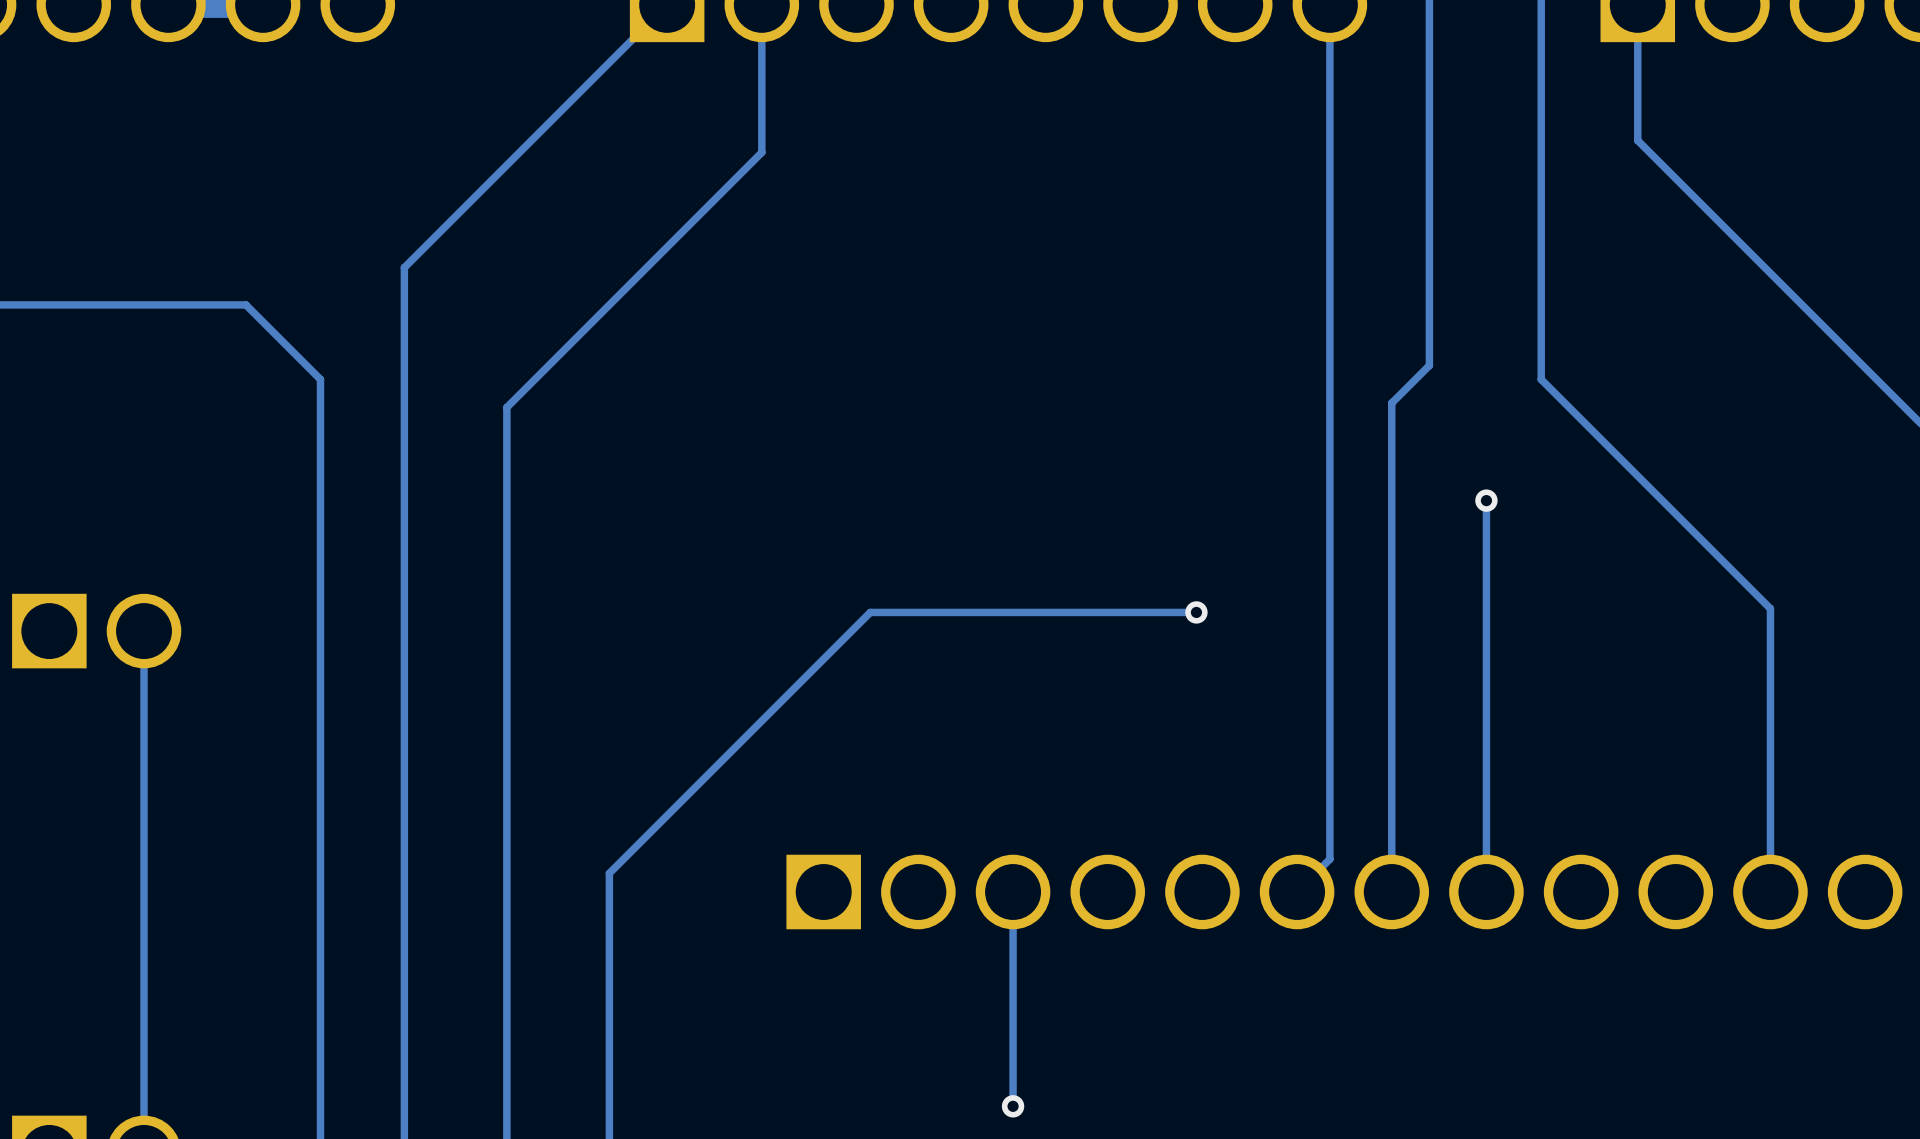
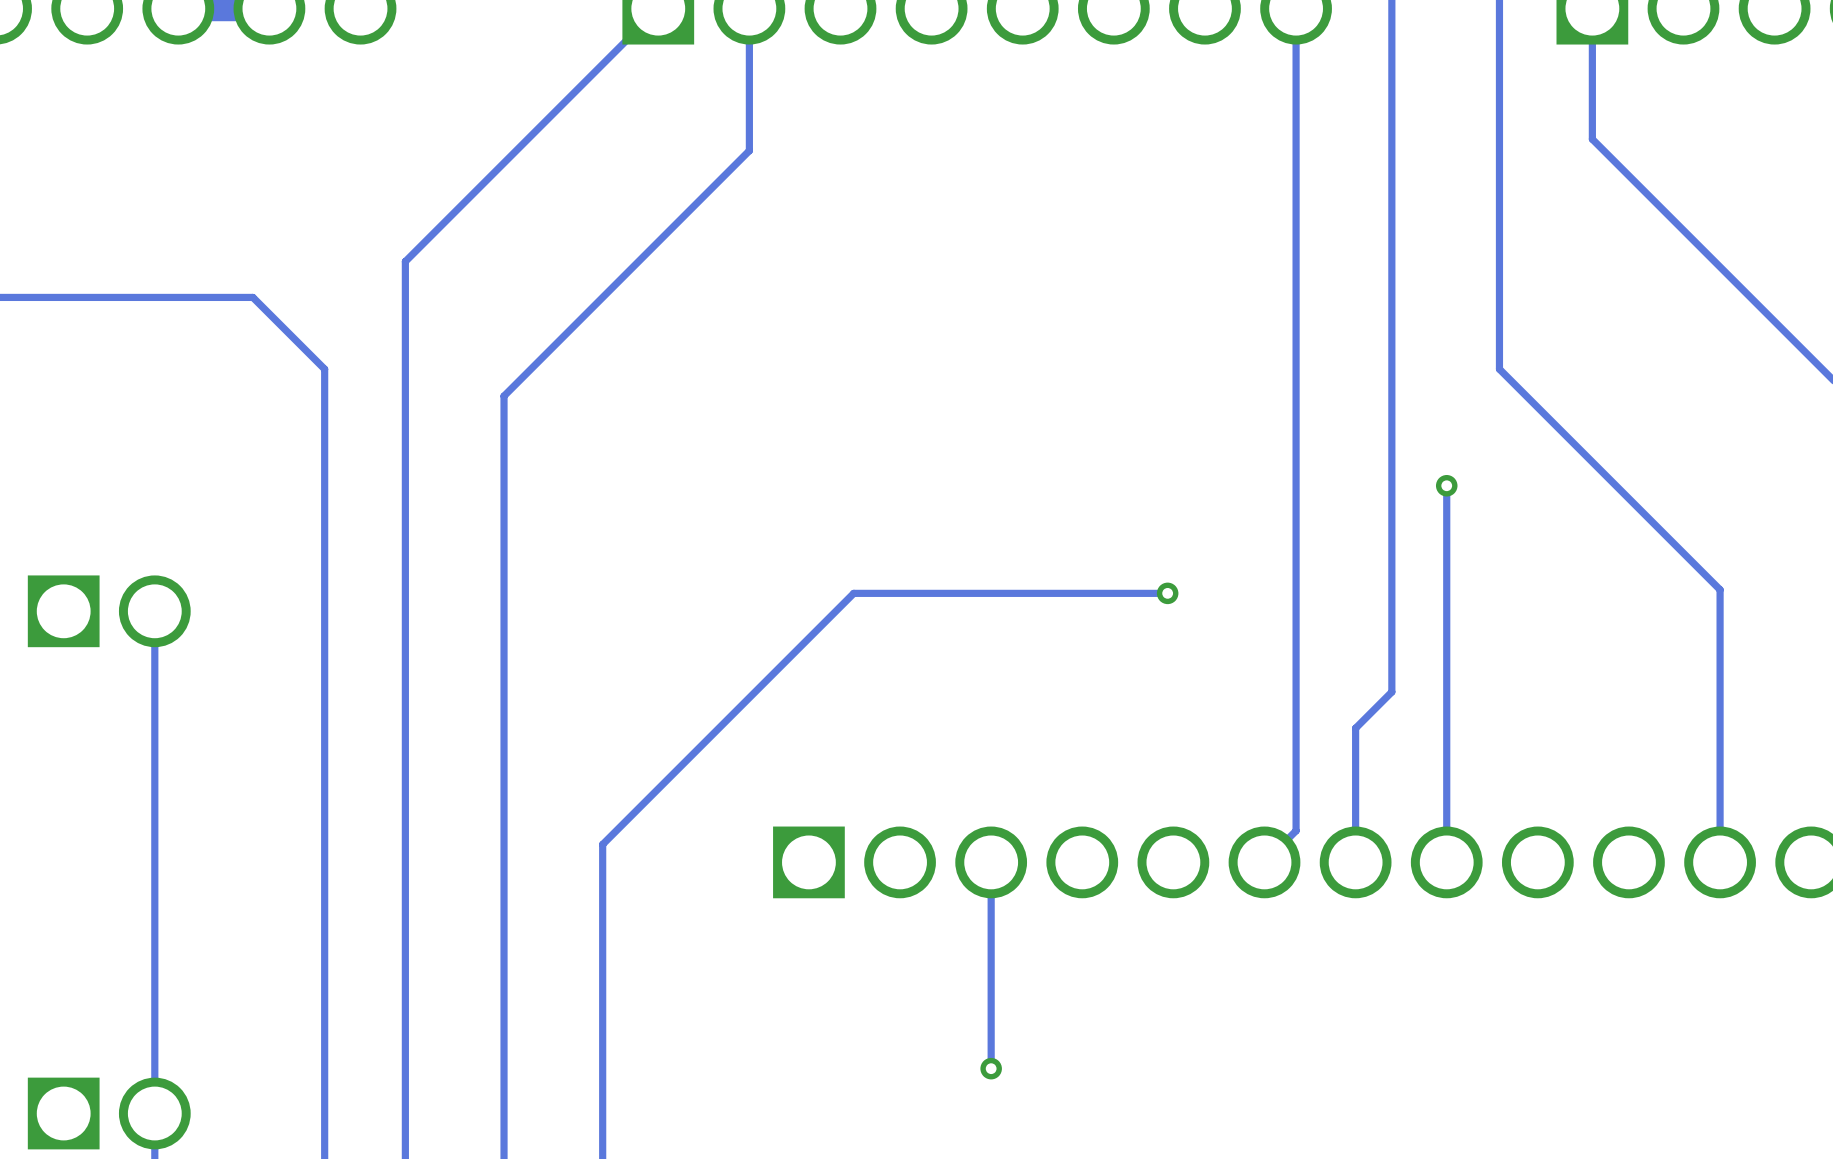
track: (1429, 365) (1391, 403) (1391, 752) -> (1391, 355) (1391, 692) (1355, 728)

